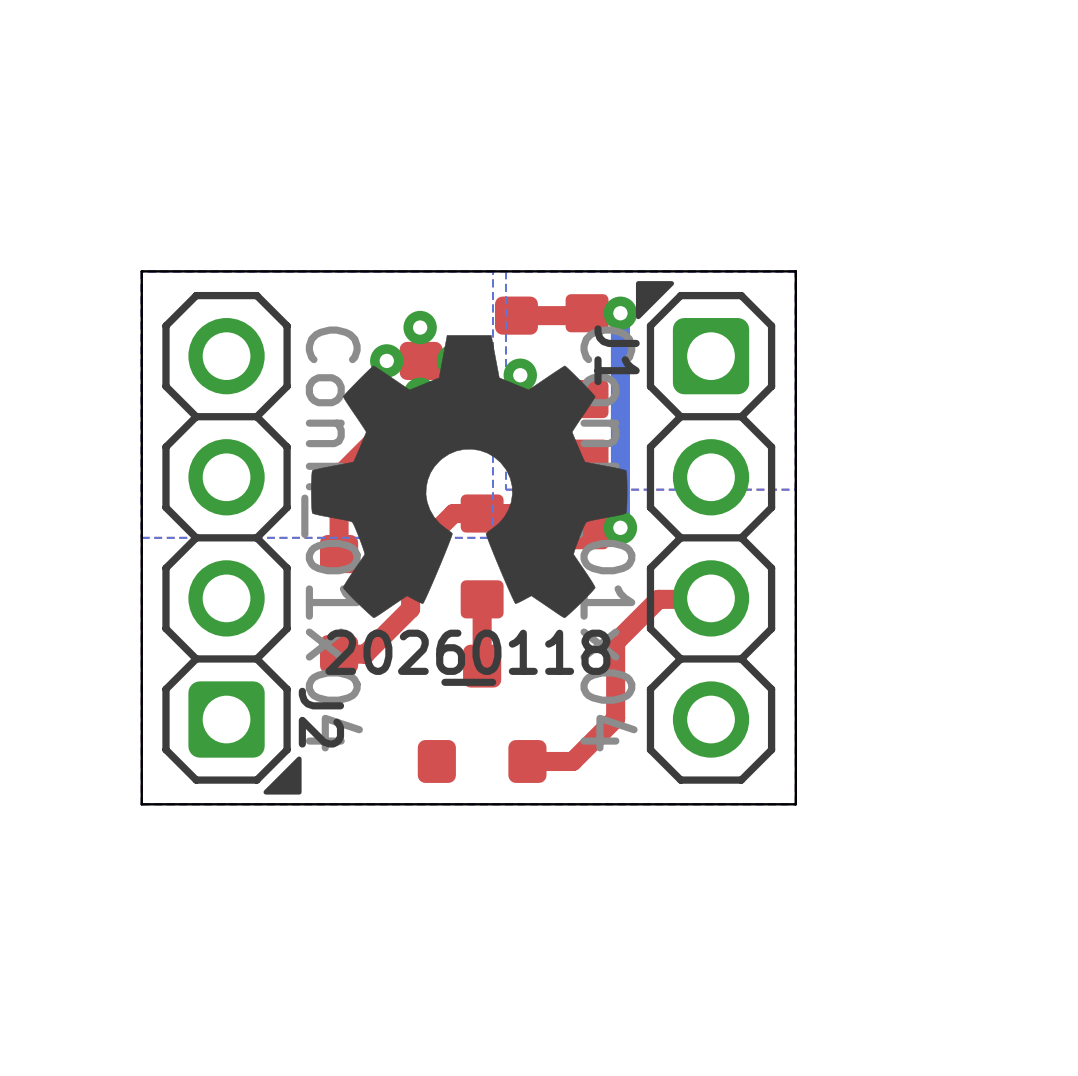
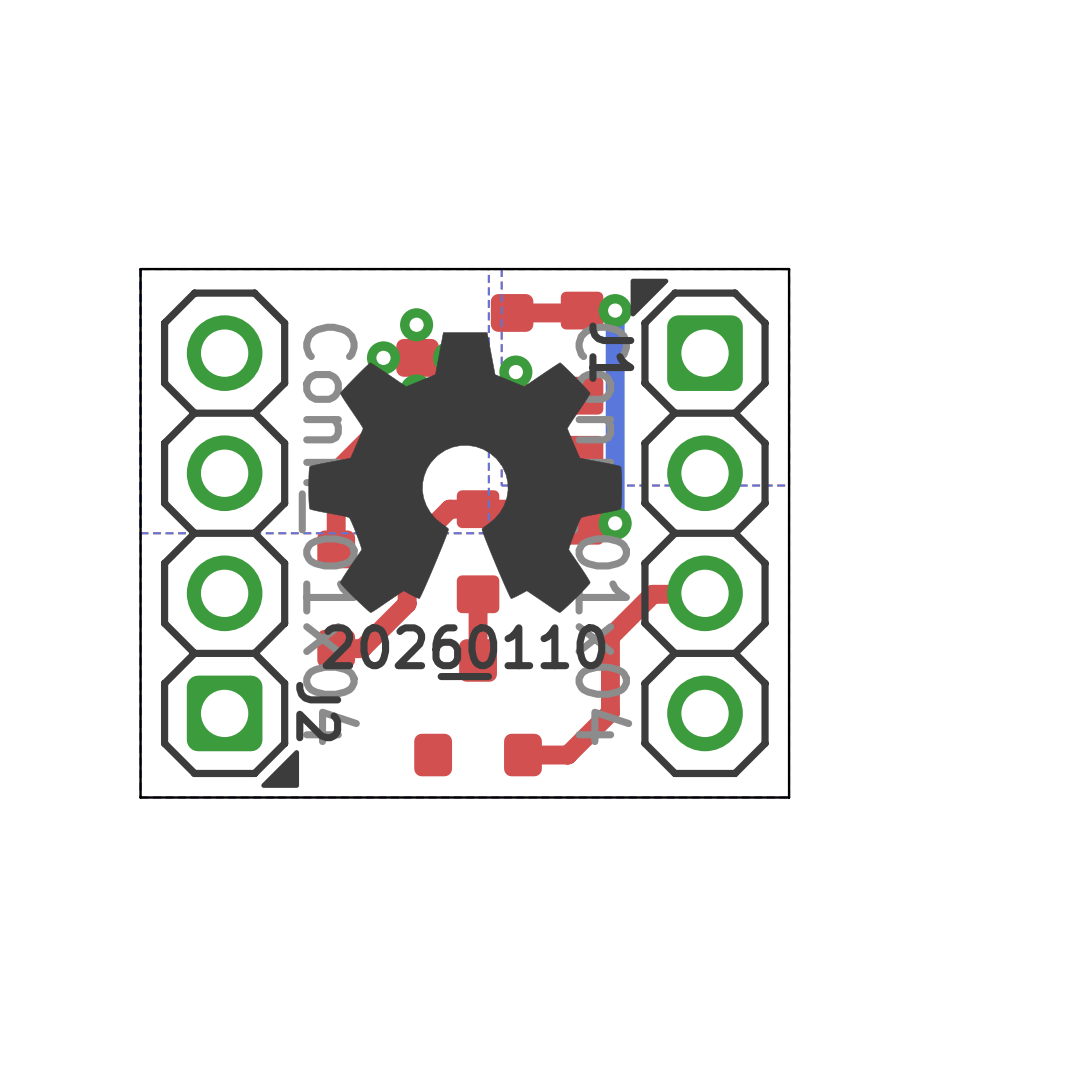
drawing shape: [325, 629, 611, 686] -> [322, 624, 606, 681]

